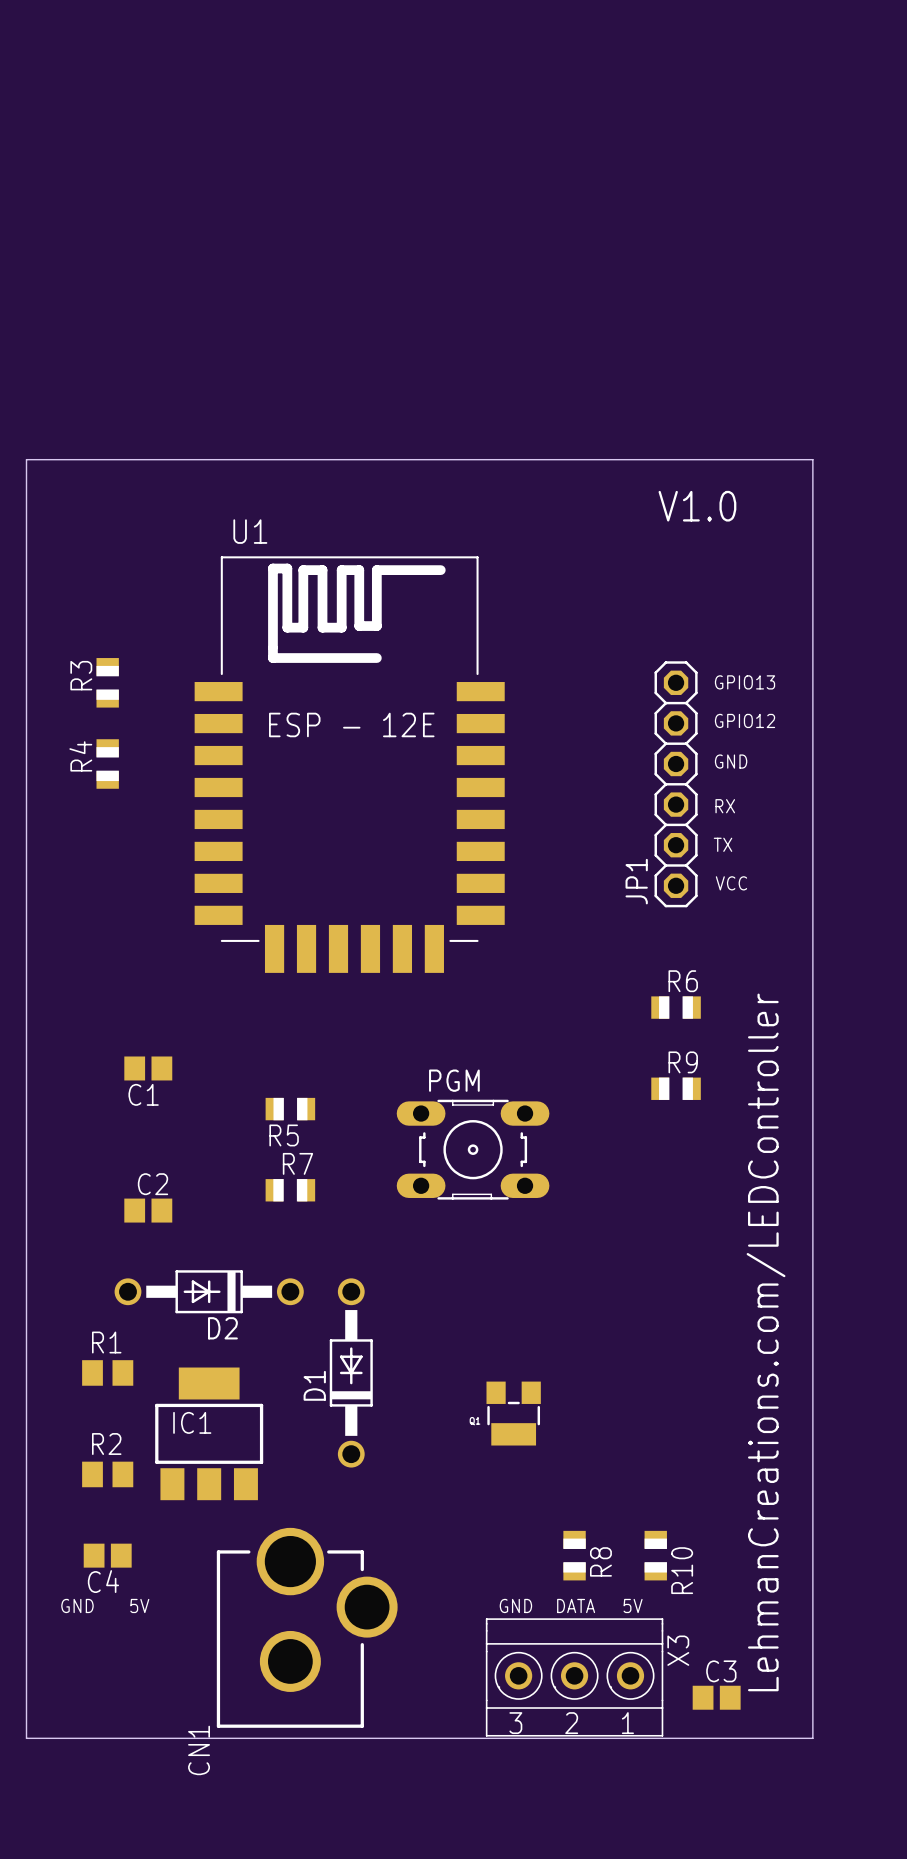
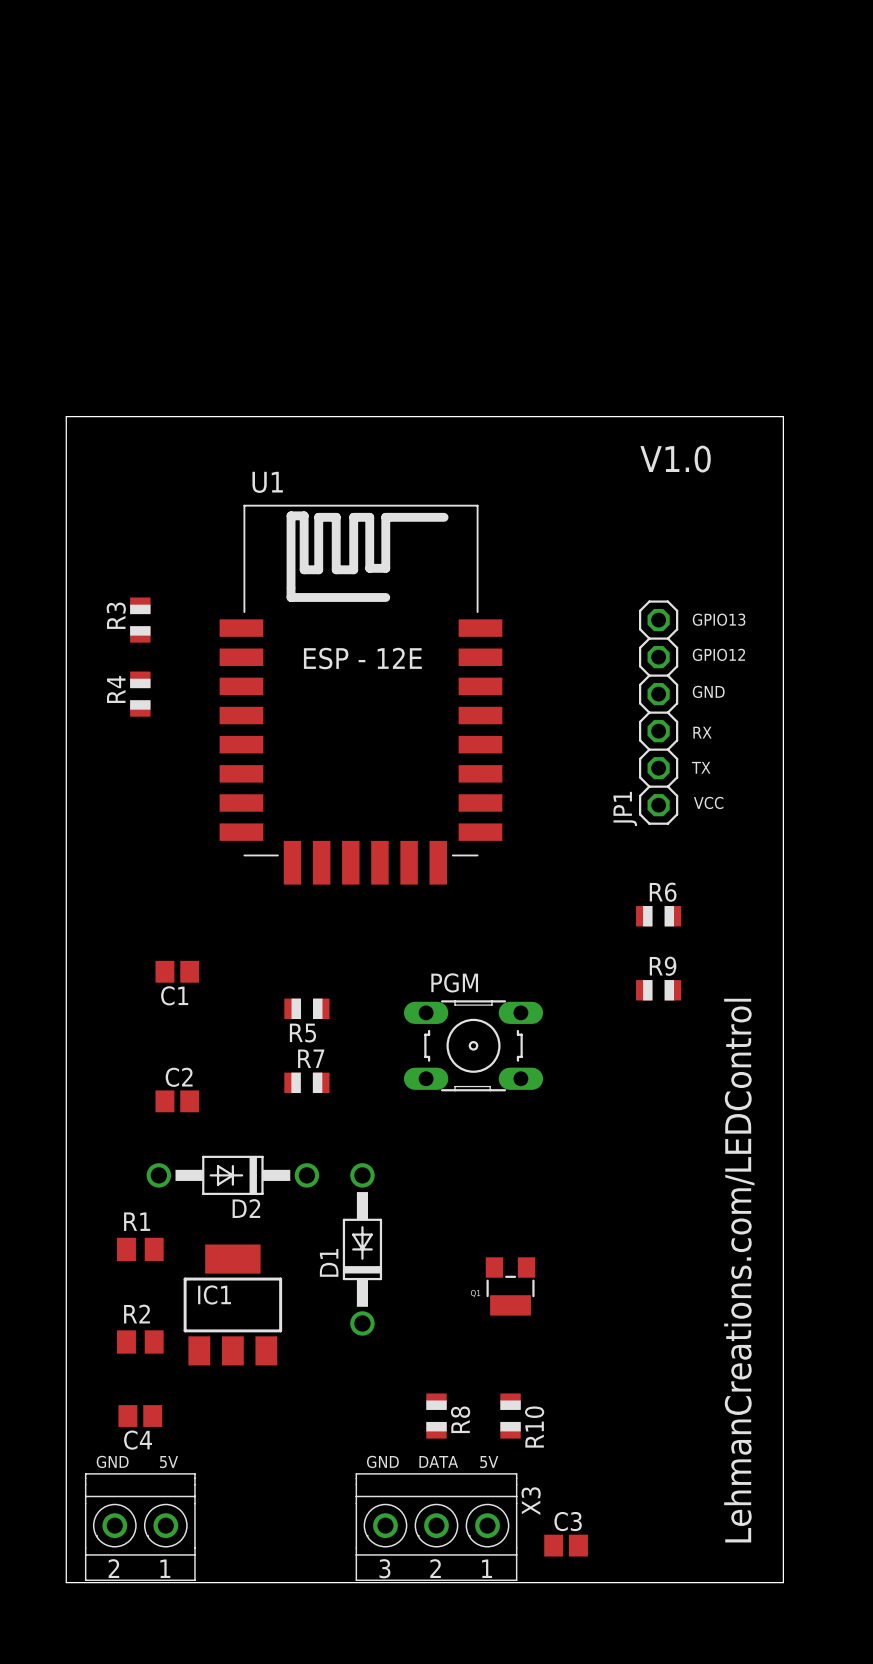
text: LehmanCreations.com/LEDController (766, 1342) -> LehmanCreations.com/LEDControl (739, 1270)
R8 position: (574, 1555) -> (436, 1416)
R10 position: (655, 1555) -> (510, 1416)
text position: GND (515, 1605) -> GND (382, 1461)
text position: DATA (576, 1605) -> DATA (438, 1461)
text position: 5V (633, 1605) -> 5V (489, 1462)
CN1: (307, 1627) -> none
part: none -> (140, 1527)
X3 position: (574, 1677) -> (436, 1527)
C3 position: (716, 1697) -> (566, 1545)

